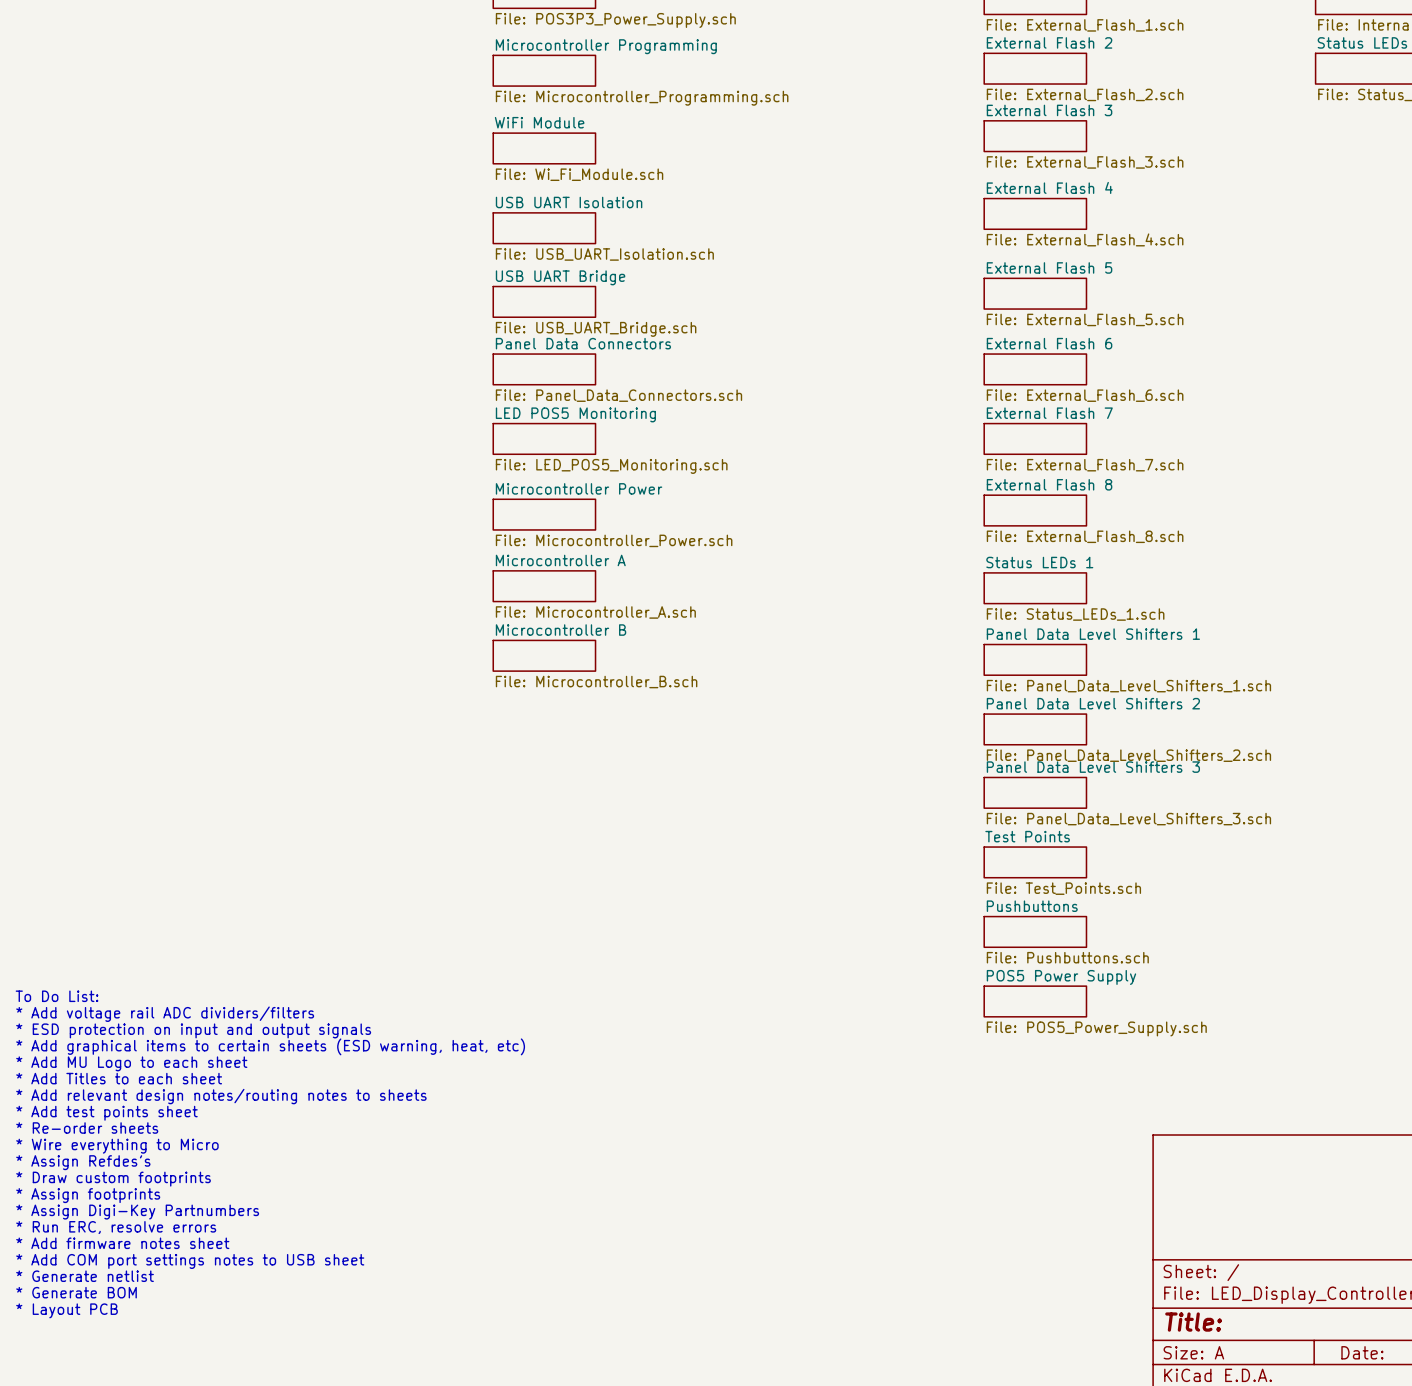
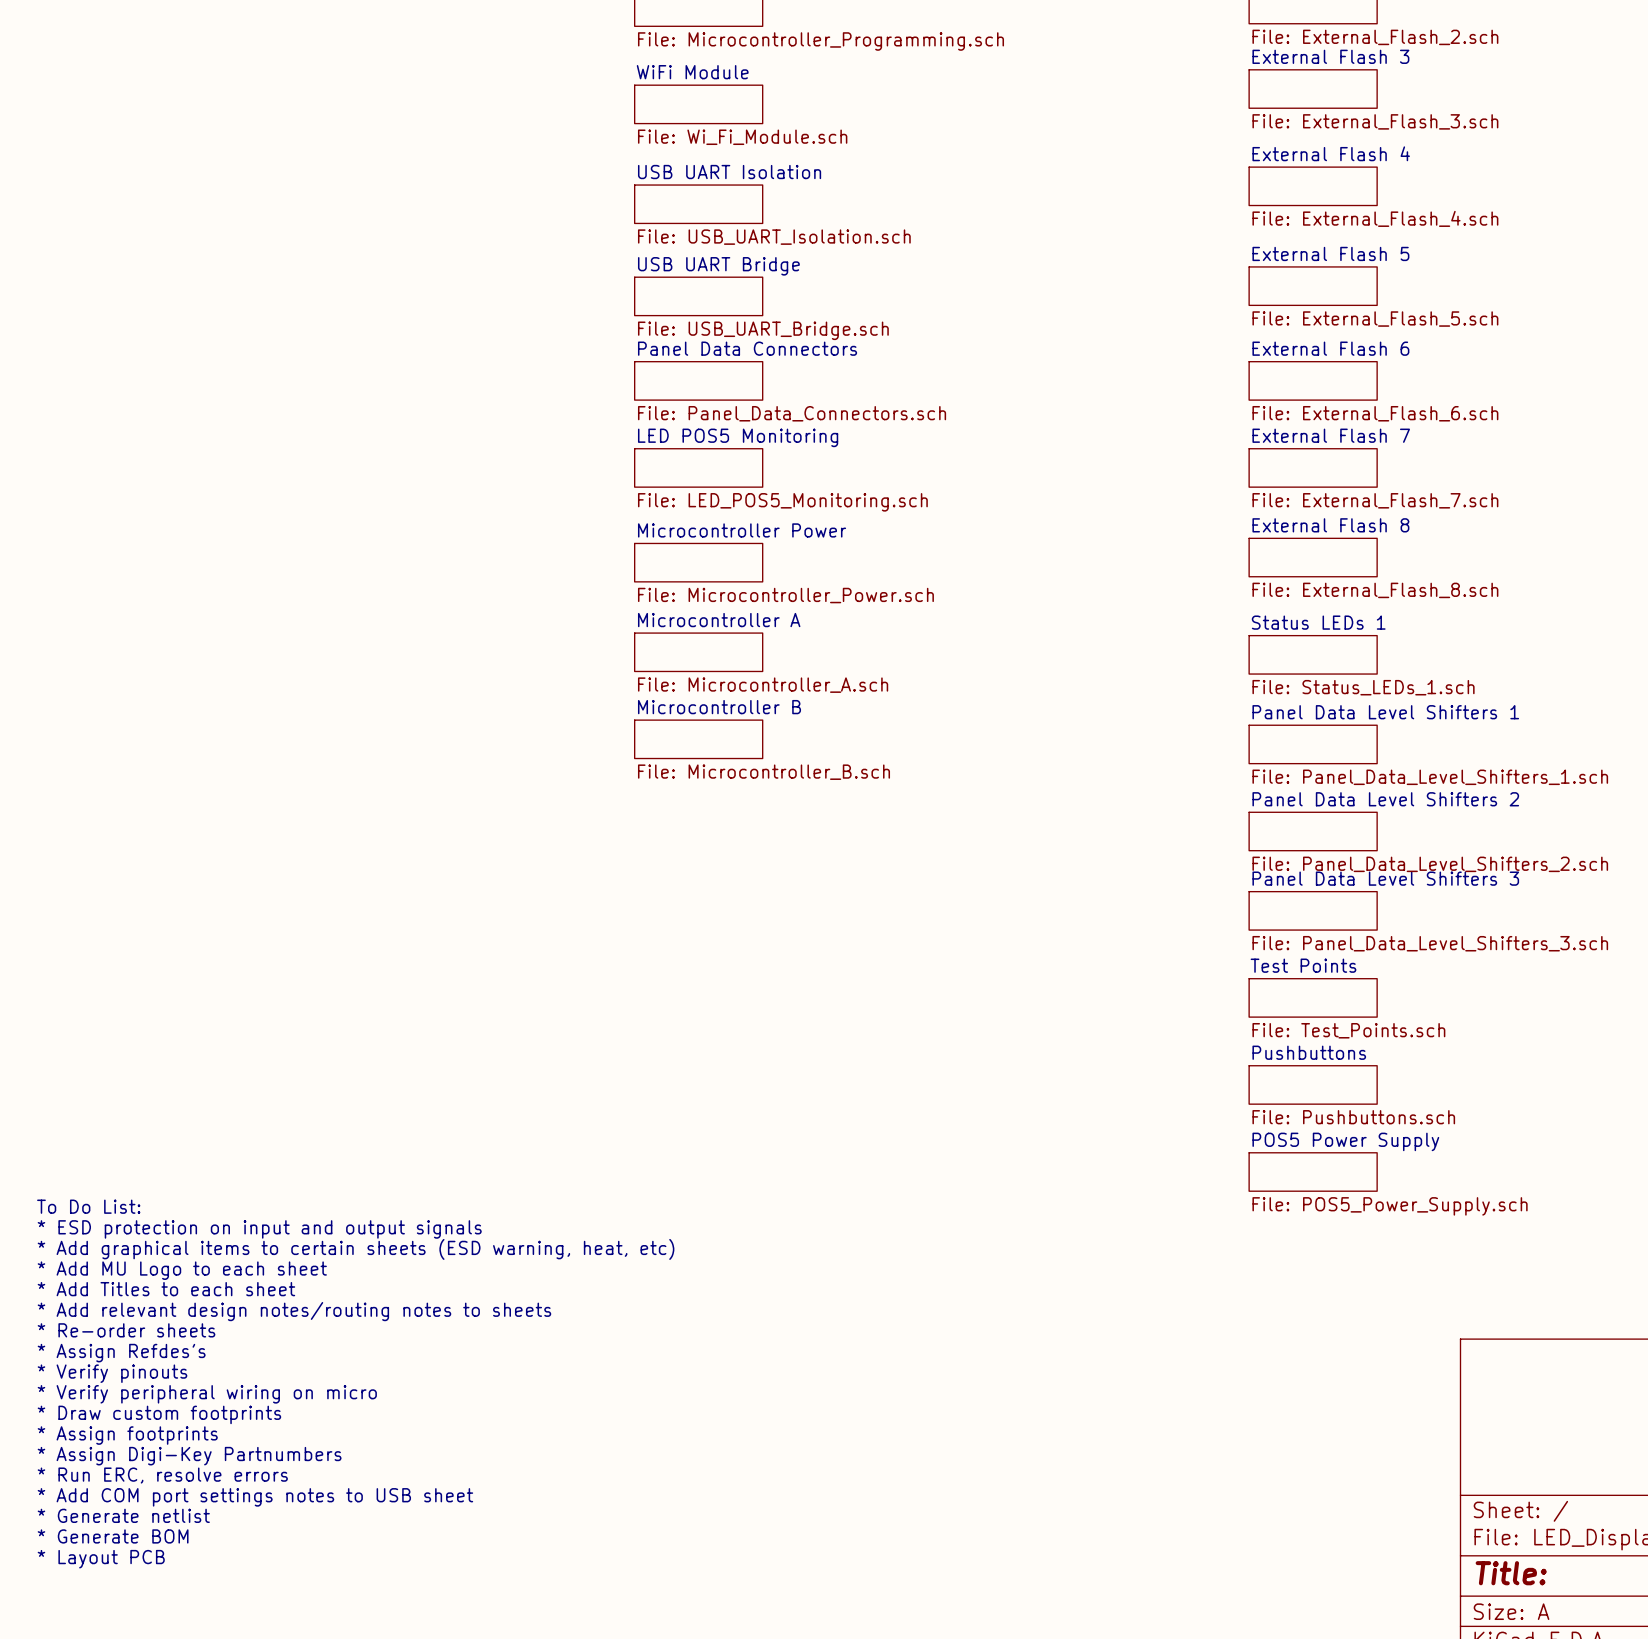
text: To Do List: (57, 996) -> none
text: * Add voltage rail ADC dividers/filters (165, 1014) -> none
text: * ESD protection on input and output signals (193, 1030) -> To Do List: (88, 1206)
text: * Add graphical items to certain sheets (ESD warning, heat, etc) (270, 1046) -> * ESD protection on input and output signals (259, 1229)
text: * Add MU Logo to each sheet (131, 1063) -> * Add graphical items to certain sheets (ESD warning, heat, etc) (356, 1249)
text: * Add Titles to each sheet (119, 1078) -> * Add MU Logo to each sheet (182, 1270)
text: * Add relevant design notes/routing notes to sheets (221, 1096) -> * Add Titles to each sheet (166, 1289)
text: * Add test points sheet (106, 1113) -> * Add relevant design notes/routing notes to sheets (294, 1311)
text: * Wire everything to Micro (117, 1146) -> * Assign Refdes's (121, 1353)
text: * Assign Refdes's (83, 1162) -> * Verify pinouts (112, 1373)
text: * Draw custom footprints (113, 1179) -> * Verify peripheral wiring on micro (207, 1394)
text: * Assign footprints (88, 1195) -> * Draw custom footprints (159, 1414)
text: * Assign Digi-Key Partnumbers (137, 1212) -> * Assign footprints (127, 1435)
text: * Run ERC, resolve errors (116, 1227) -> * Assign Digi-Key Partnumbers (189, 1456)
text: * Add firmware notes sheet (122, 1243) -> * Run ERC, resolve errors (162, 1475)

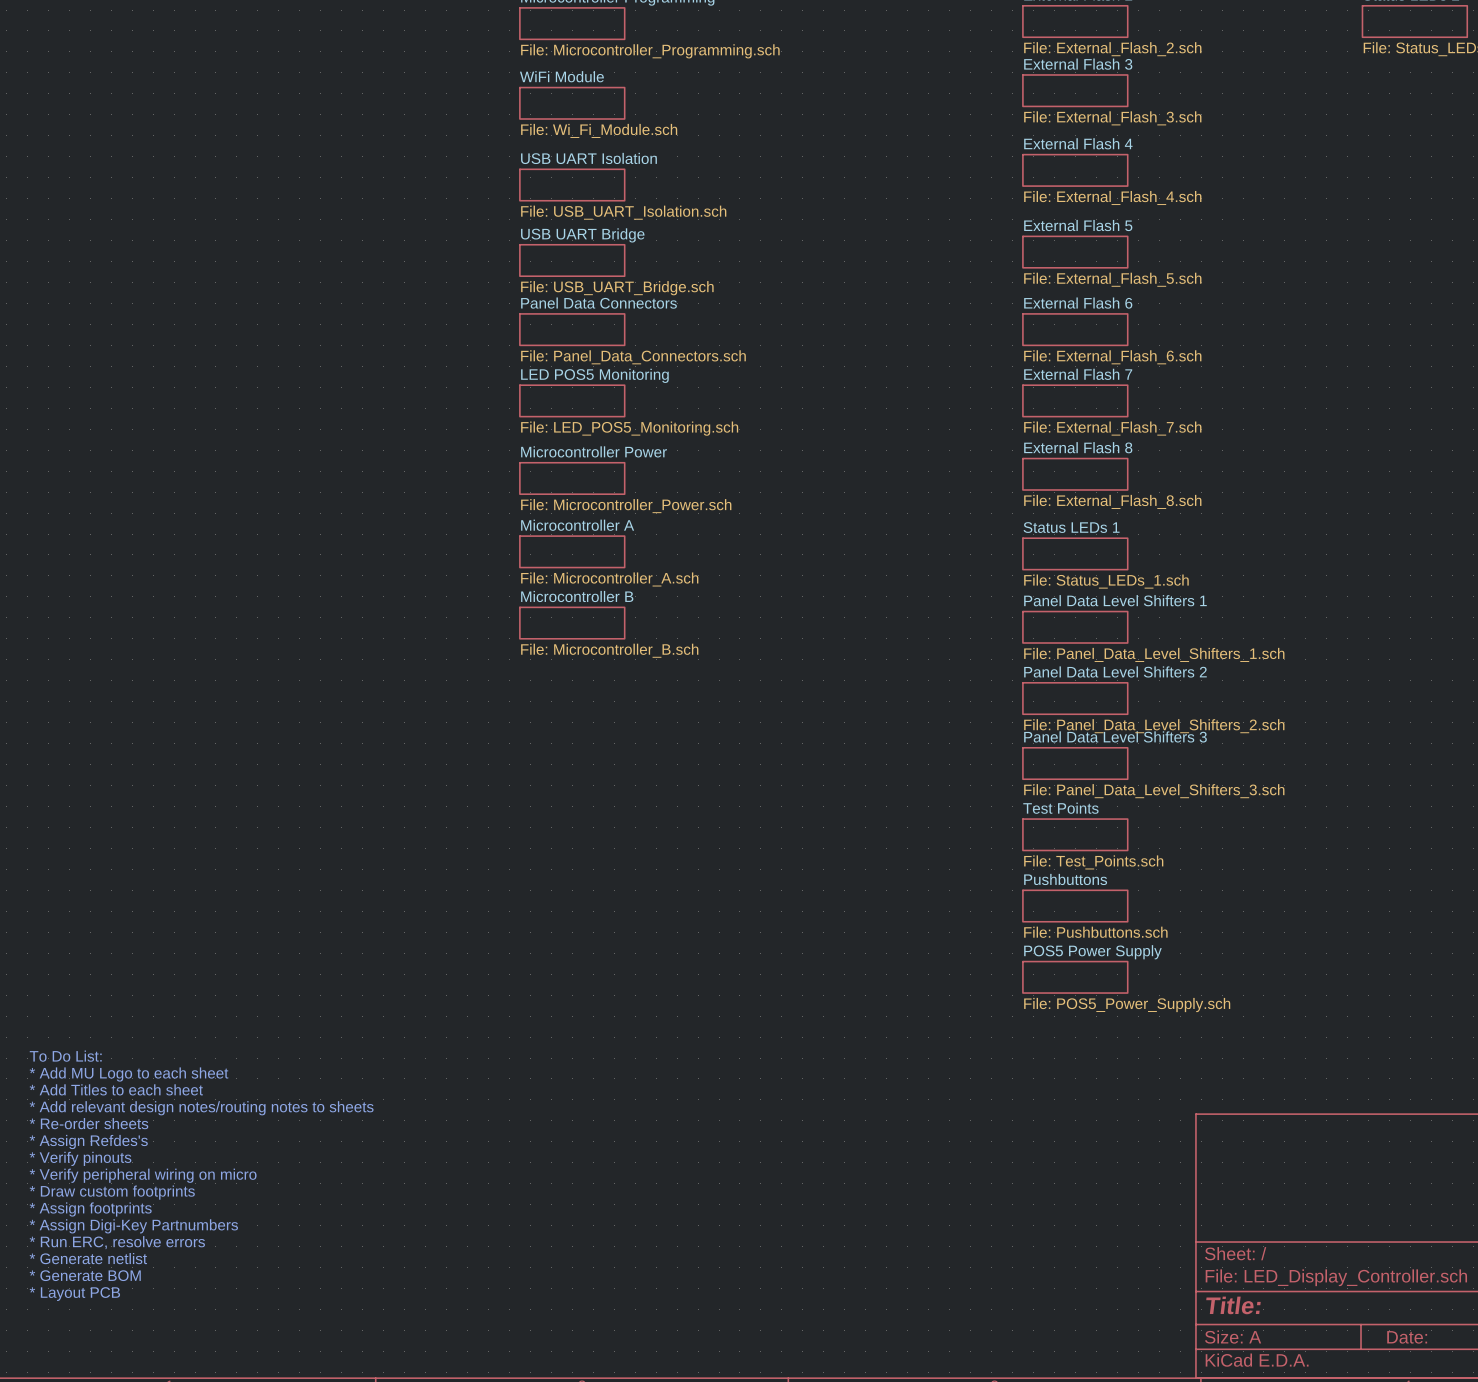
text: To Do List: (88, 1206) -> none
text: * ESD protection on input and output signals (259, 1229) -> none
text: * Add graphical items to certain sheets (ESD warning, heat, etc) (356, 1249) -> none
text: * Add MU Logo to each sheet (182, 1270) -> To Do List: (65, 1056)
text: * Add Titles to each sheet (166, 1289) -> * Add MU Logo to each sheet (129, 1074)
text: * Add relevant design notes/routing notes to sheets (294, 1311) -> * Add Titles to each sheet (116, 1089)
text: * Re-order sheets (126, 1330) -> * Add relevant design notes/routing notes to sheets (201, 1108)
text: * Assign Refdes's (121, 1353) -> * Re-order sheets (88, 1123)
text: * Verify pinouts (112, 1373) -> * Assign Refdes's (88, 1141)
text: * Verify peripheral wiring on micro (207, 1394) -> * Verify pinouts (80, 1158)
text: * Draw custom footprints (159, 1414) -> * Verify peripheral wiring on micro (143, 1175)
text: * Assign footprints (127, 1435) -> * Draw custom footprints (112, 1192)
text: * Assign Digi-Key Partnumbers (189, 1456) -> * Assign footprints (90, 1209)
text: * Run ERC, resolve errors (162, 1475) -> * Assign Digi-Key Partnumbers (133, 1226)
text: * Add COM port settings notes to USB sheet (255, 1497) -> * Run ERC, resolve errors (117, 1242)

